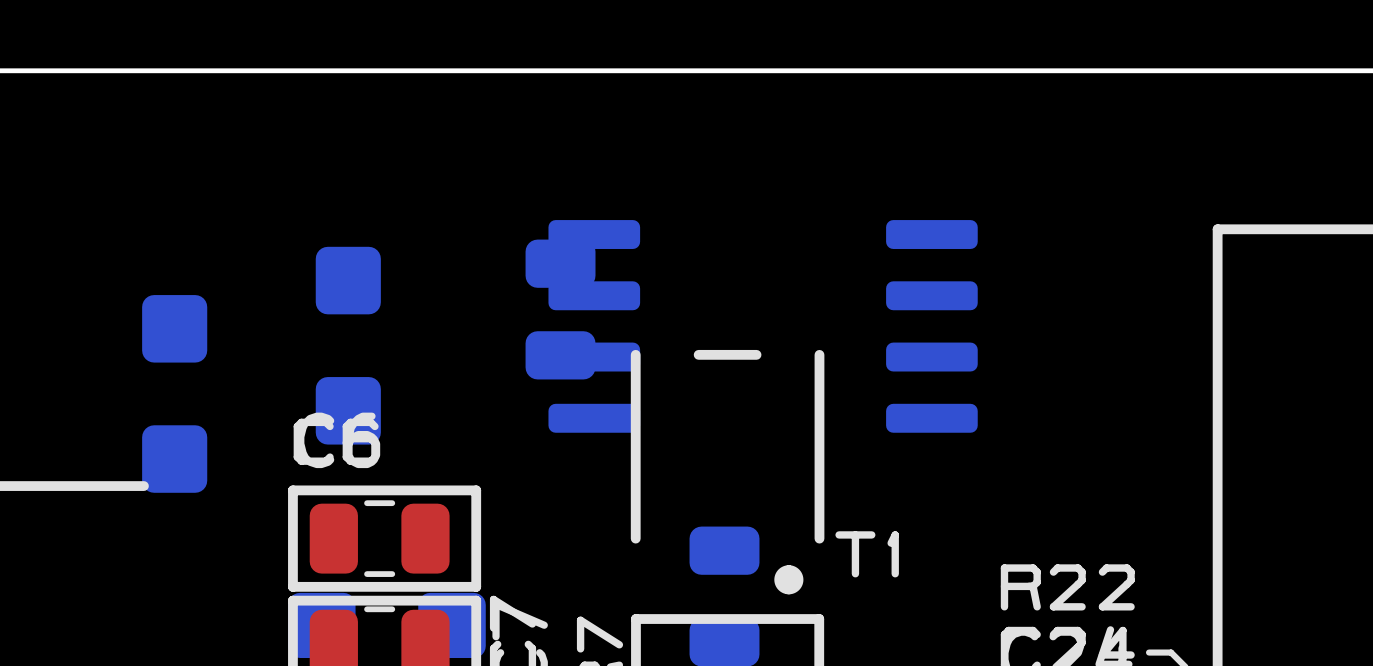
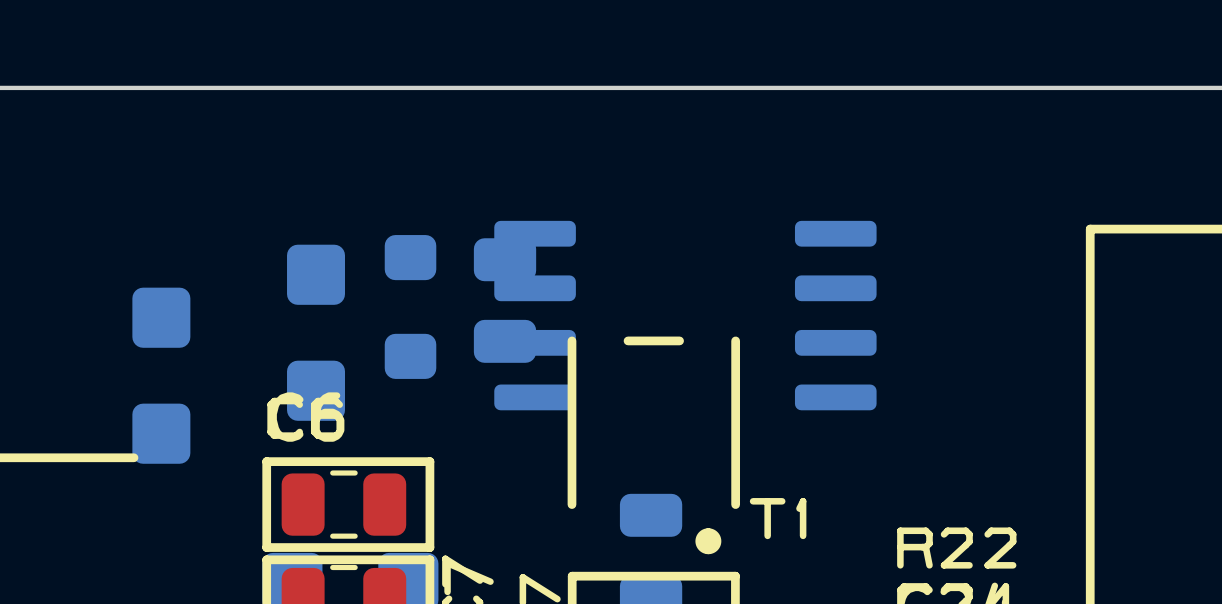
part: none -> (410, 306)

